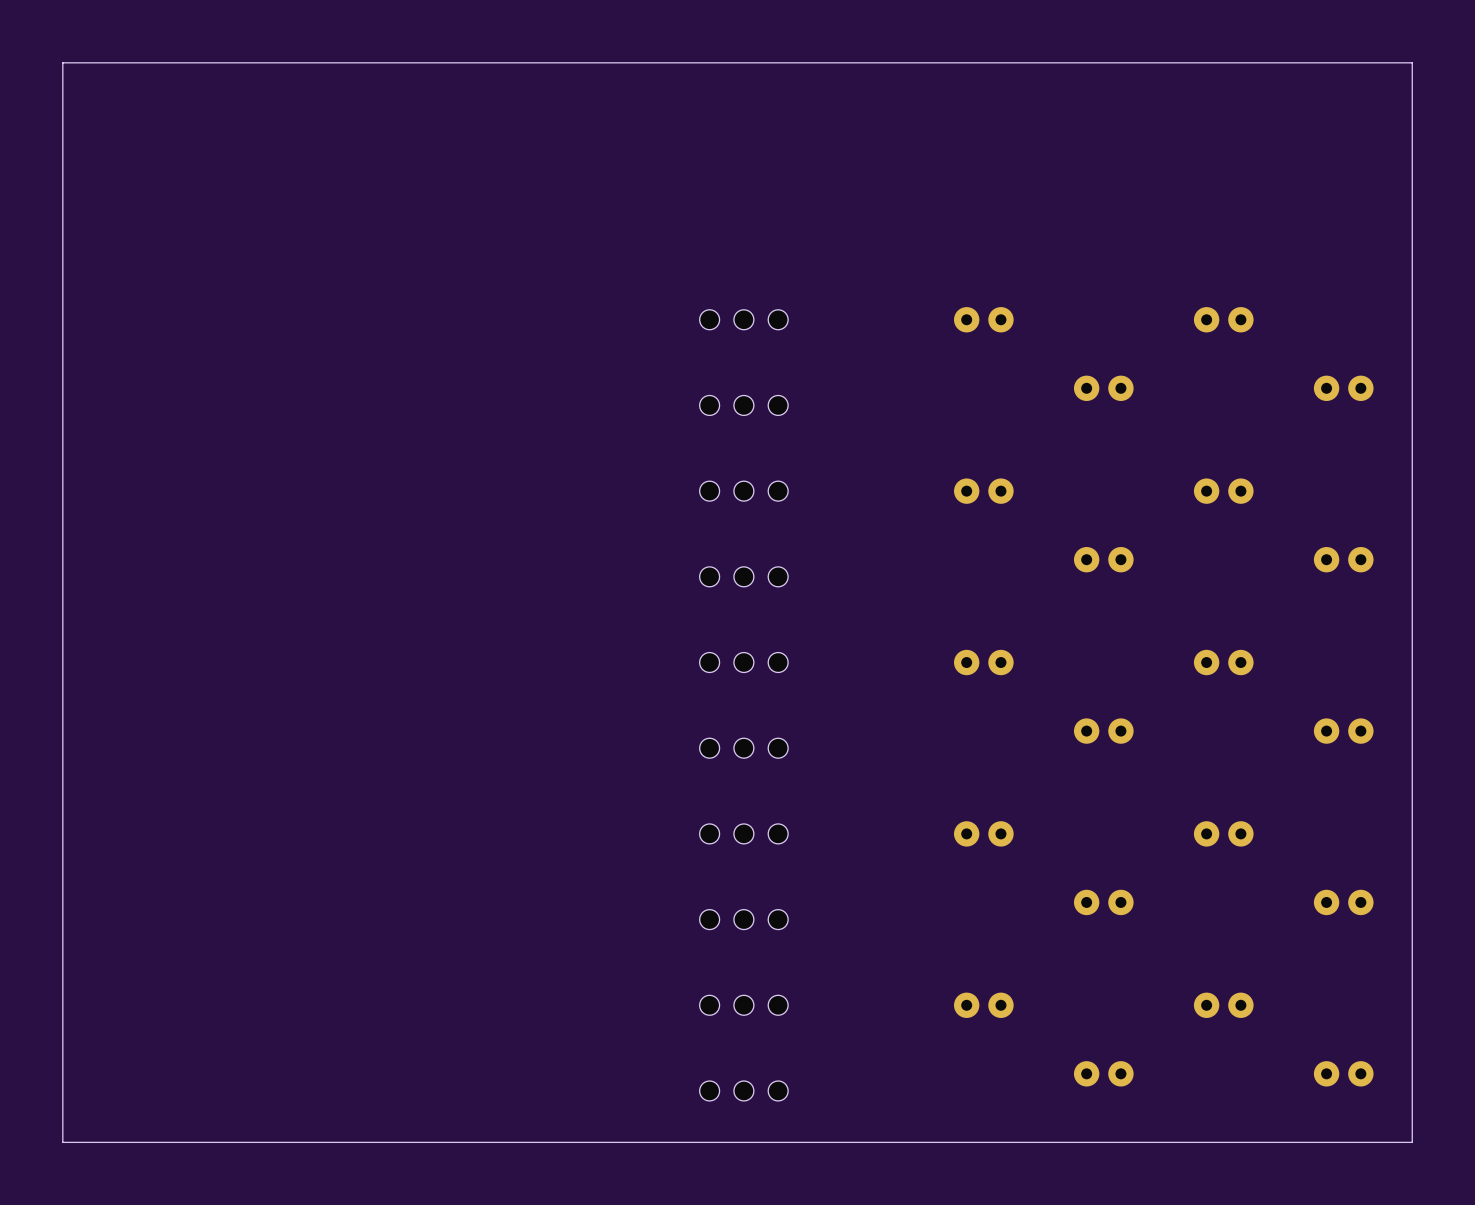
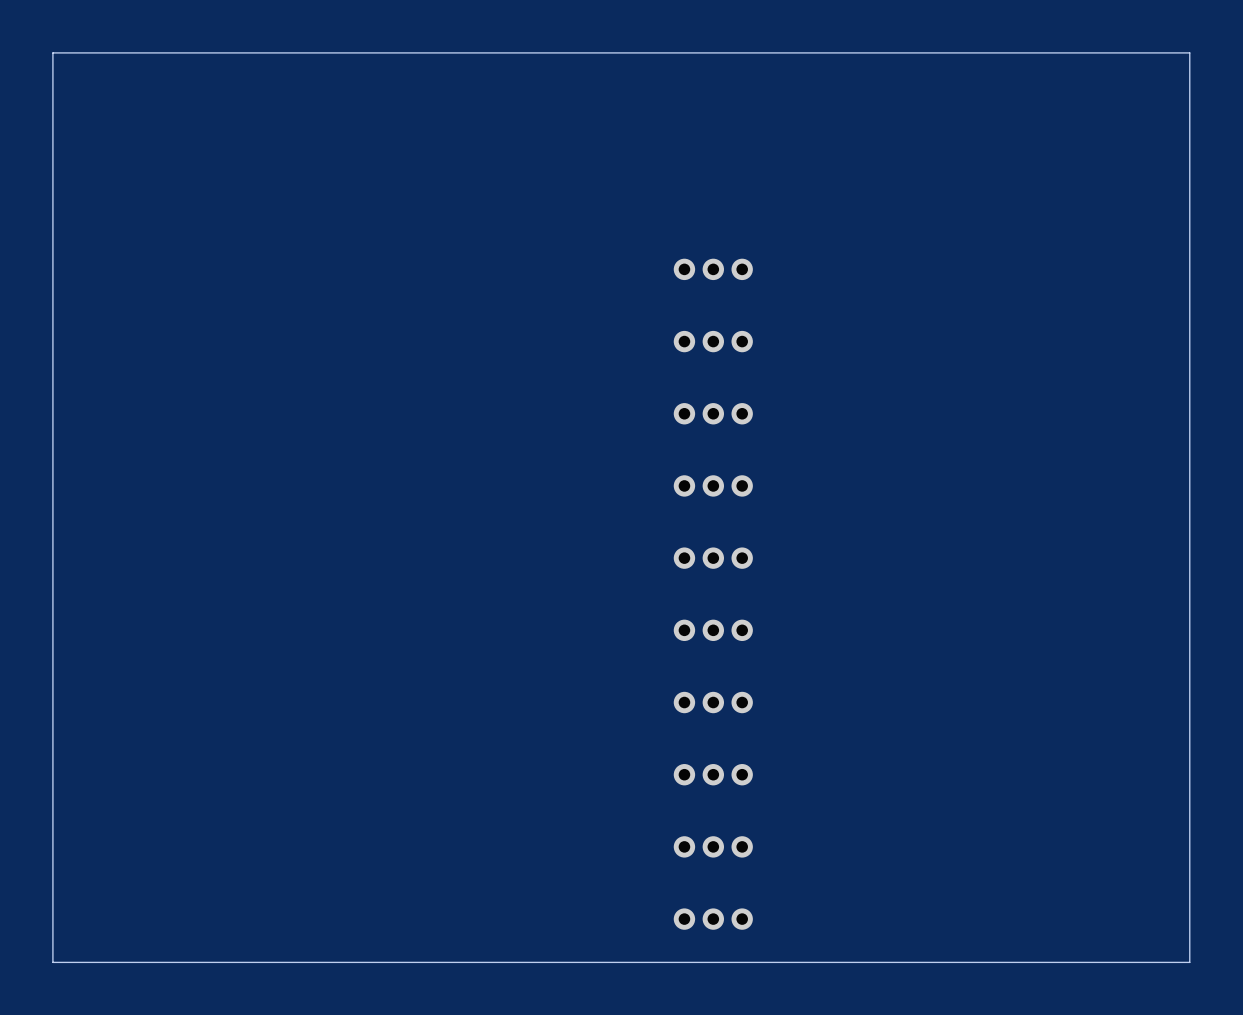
part: (743, 319) -> none
part: none -> (713, 269)
part: (983, 319) -> none
part: (1223, 319) -> none
part: (1103, 388) -> none
part: (1343, 388) -> none
part: (743, 405) -> none
part: none -> (713, 341)
part: (743, 491) -> none
part: none -> (713, 413)
part: (983, 491) -> none
part: (1223, 491) -> none
part: (1103, 559) -> none
part: (1343, 559) -> none
part: (743, 576) -> none
part: none -> (713, 485)
part: (743, 662) -> none
part: none -> (713, 558)
part: (983, 662) -> none
part: (1223, 662) -> none
part: (1103, 731) -> none
part: (1343, 731) -> none
part: (743, 748) -> none
part: none -> (713, 630)
part: (743, 833) -> none
part: none -> (713, 702)
part: (983, 833) -> none
part: (1223, 833) -> none
part: (1103, 902) -> none
part: (1343, 902) -> none
part: (743, 919) -> none
part: none -> (713, 774)
part: (743, 1005) -> none
part: none -> (713, 846)
part: (983, 1005) -> none
part: (1223, 1005) -> none
part: (1103, 1073) -> none
part: (1343, 1073) -> none
part: (743, 1090) -> none
part: none -> (713, 919)

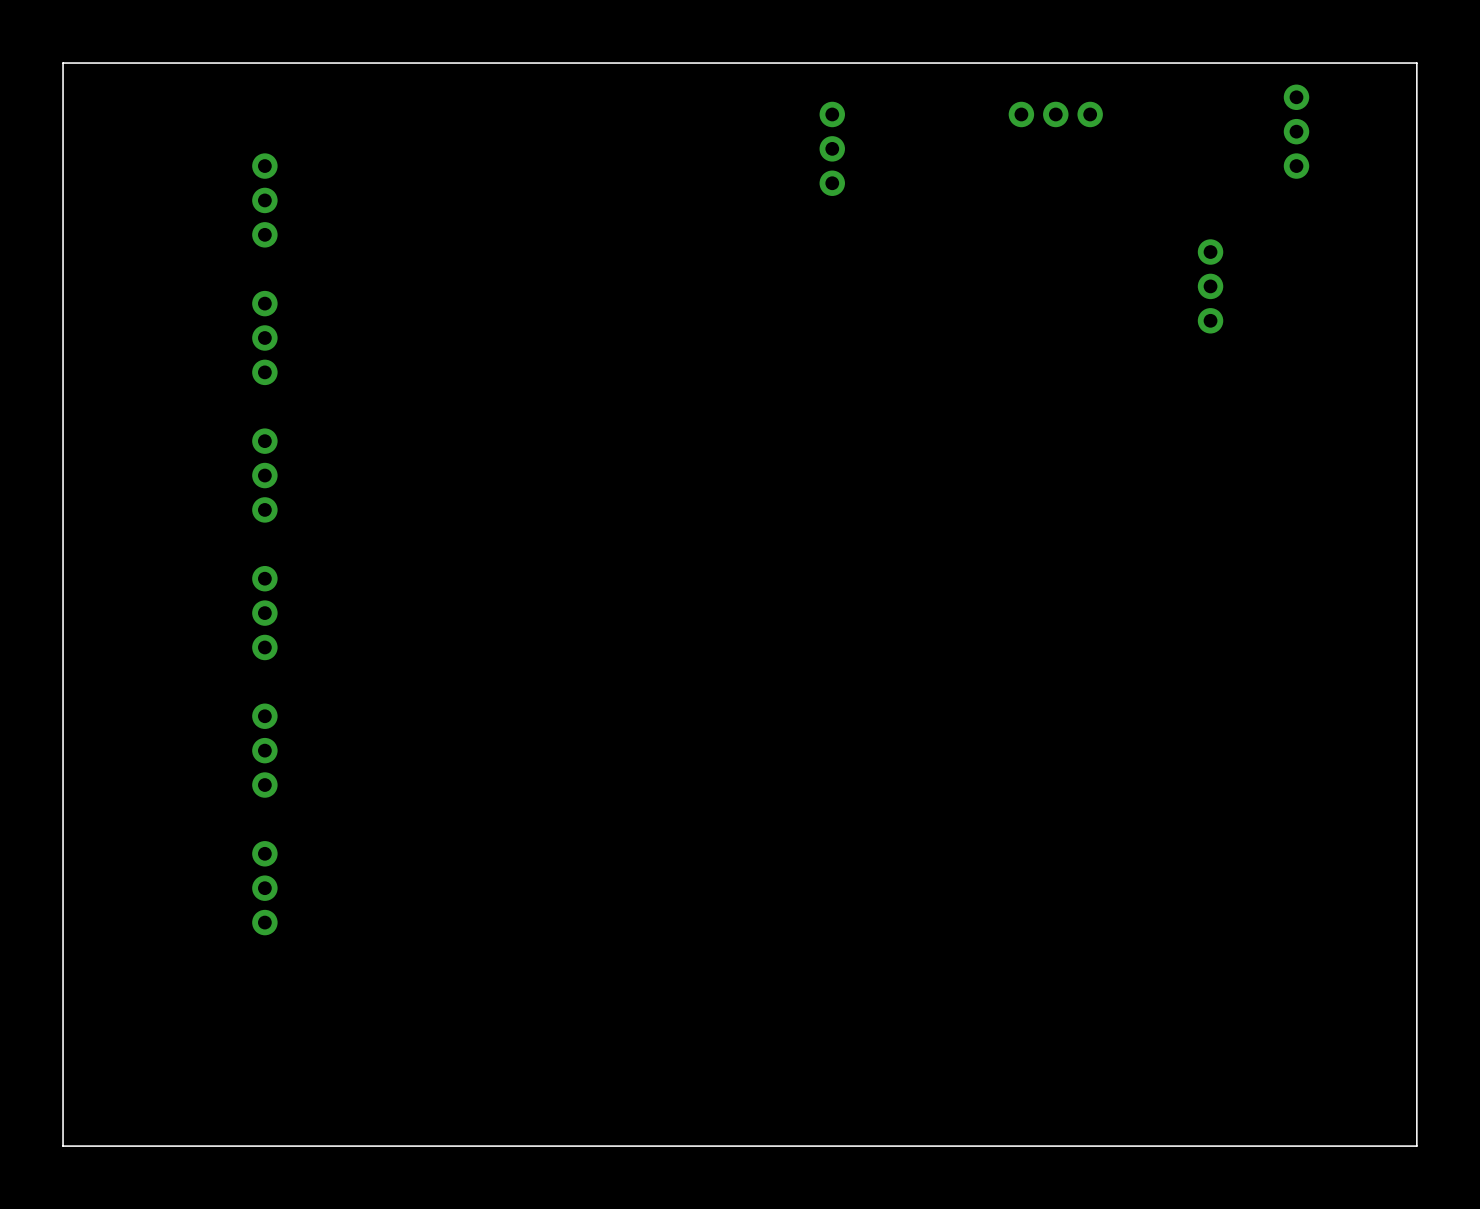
part: none -> (1055, 114)
part: none -> (1296, 131)
part: none -> (832, 148)
part: none -> (264, 200)
part: none -> (1210, 286)
part: (713, 269) -> none
part: none -> (264, 337)
part: (713, 341) -> none
part: none -> (264, 475)
part: (713, 413) -> none
part: (713, 485) -> none
part: none -> (264, 613)
part: (713, 558) -> none
part: none -> (264, 750)
part: (713, 630) -> none
part: (713, 702) -> none
part: none -> (264, 888)
part: (713, 774) -> none
part: (713, 846) -> none
part: (713, 919) -> none

